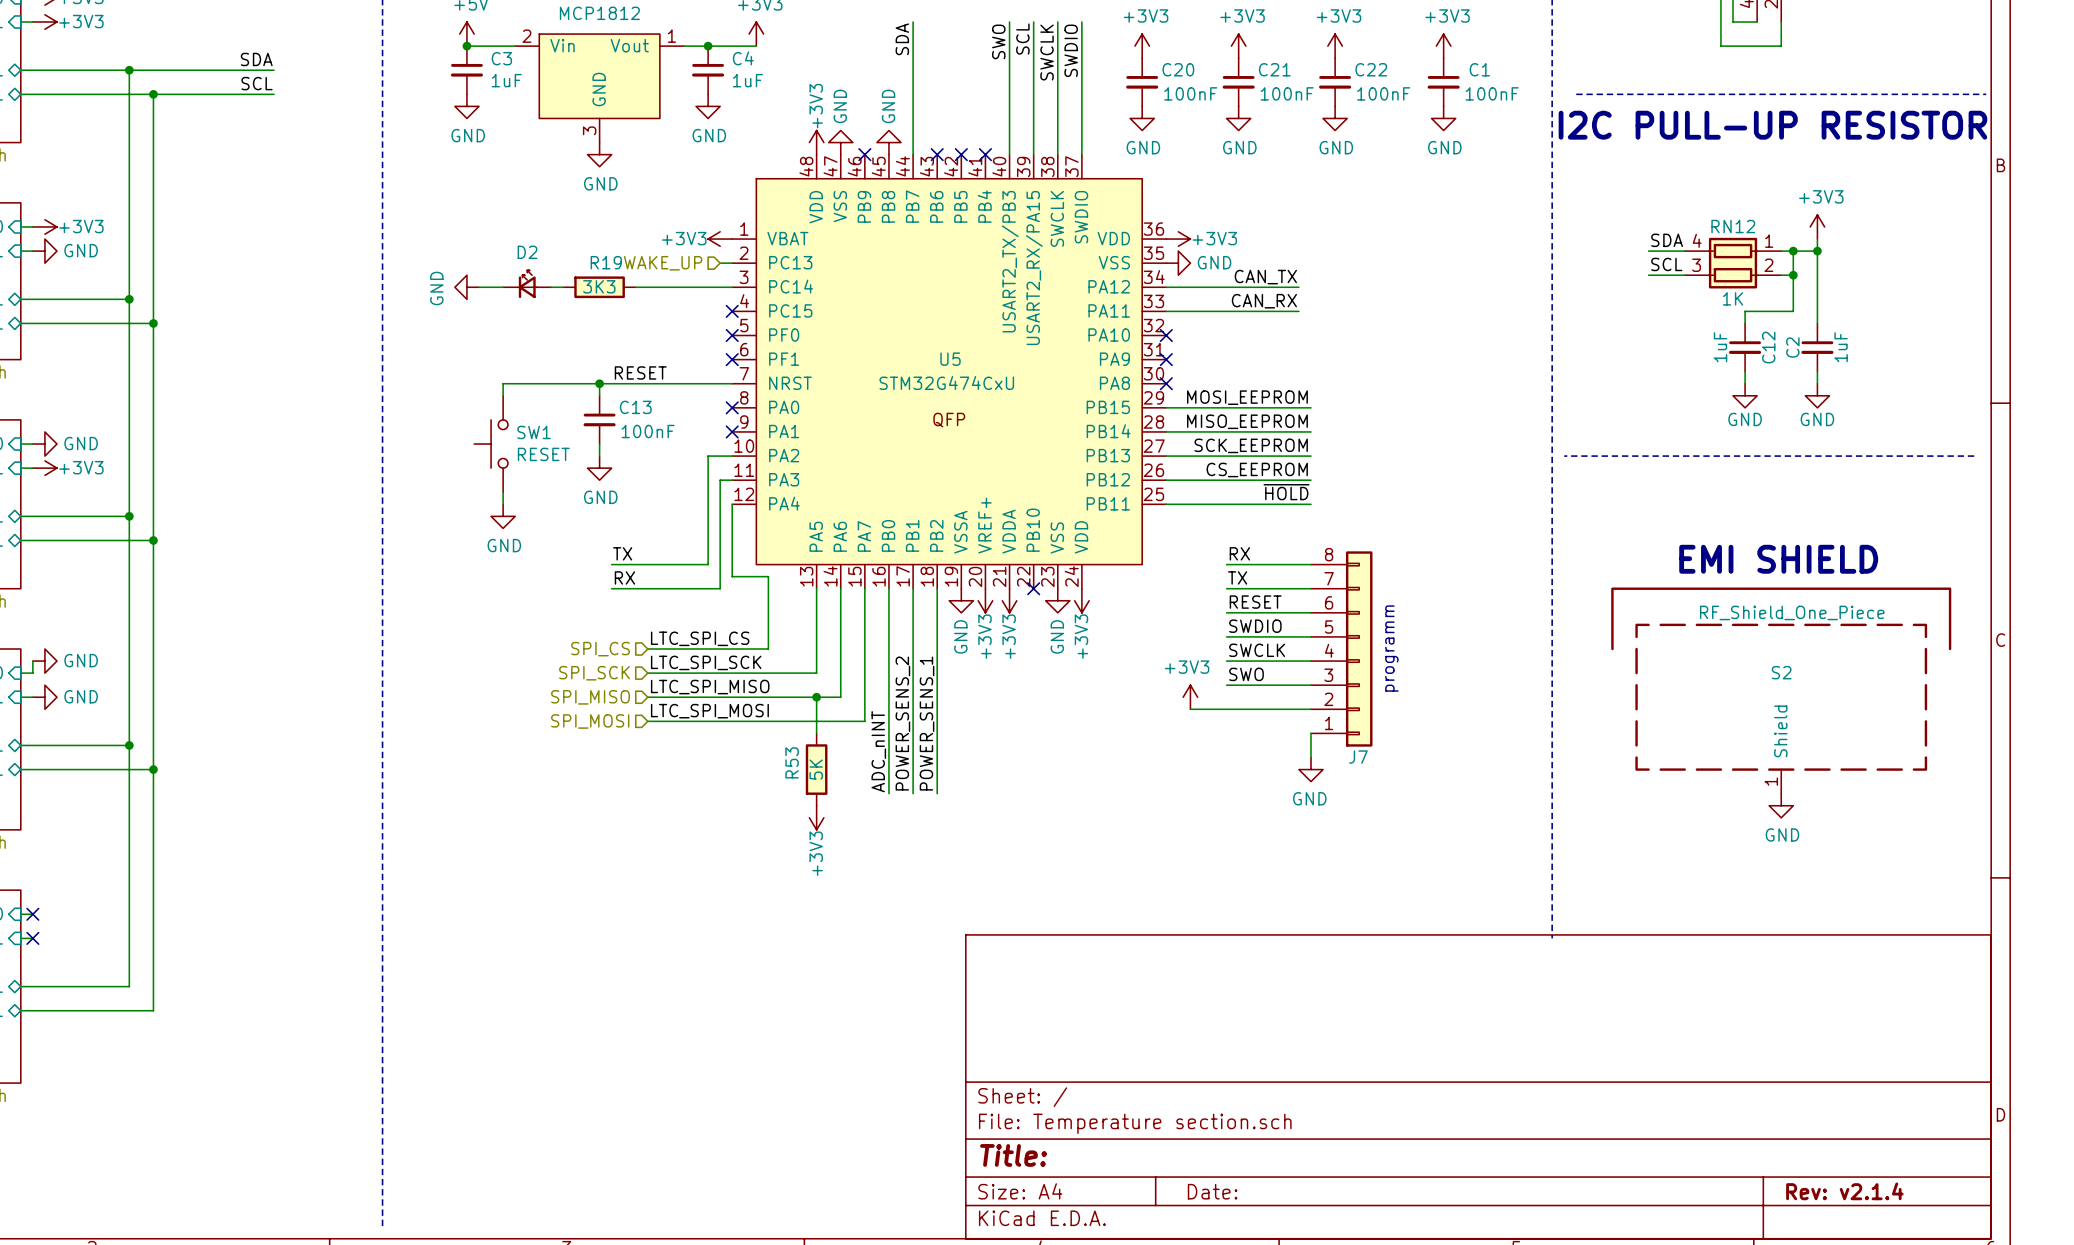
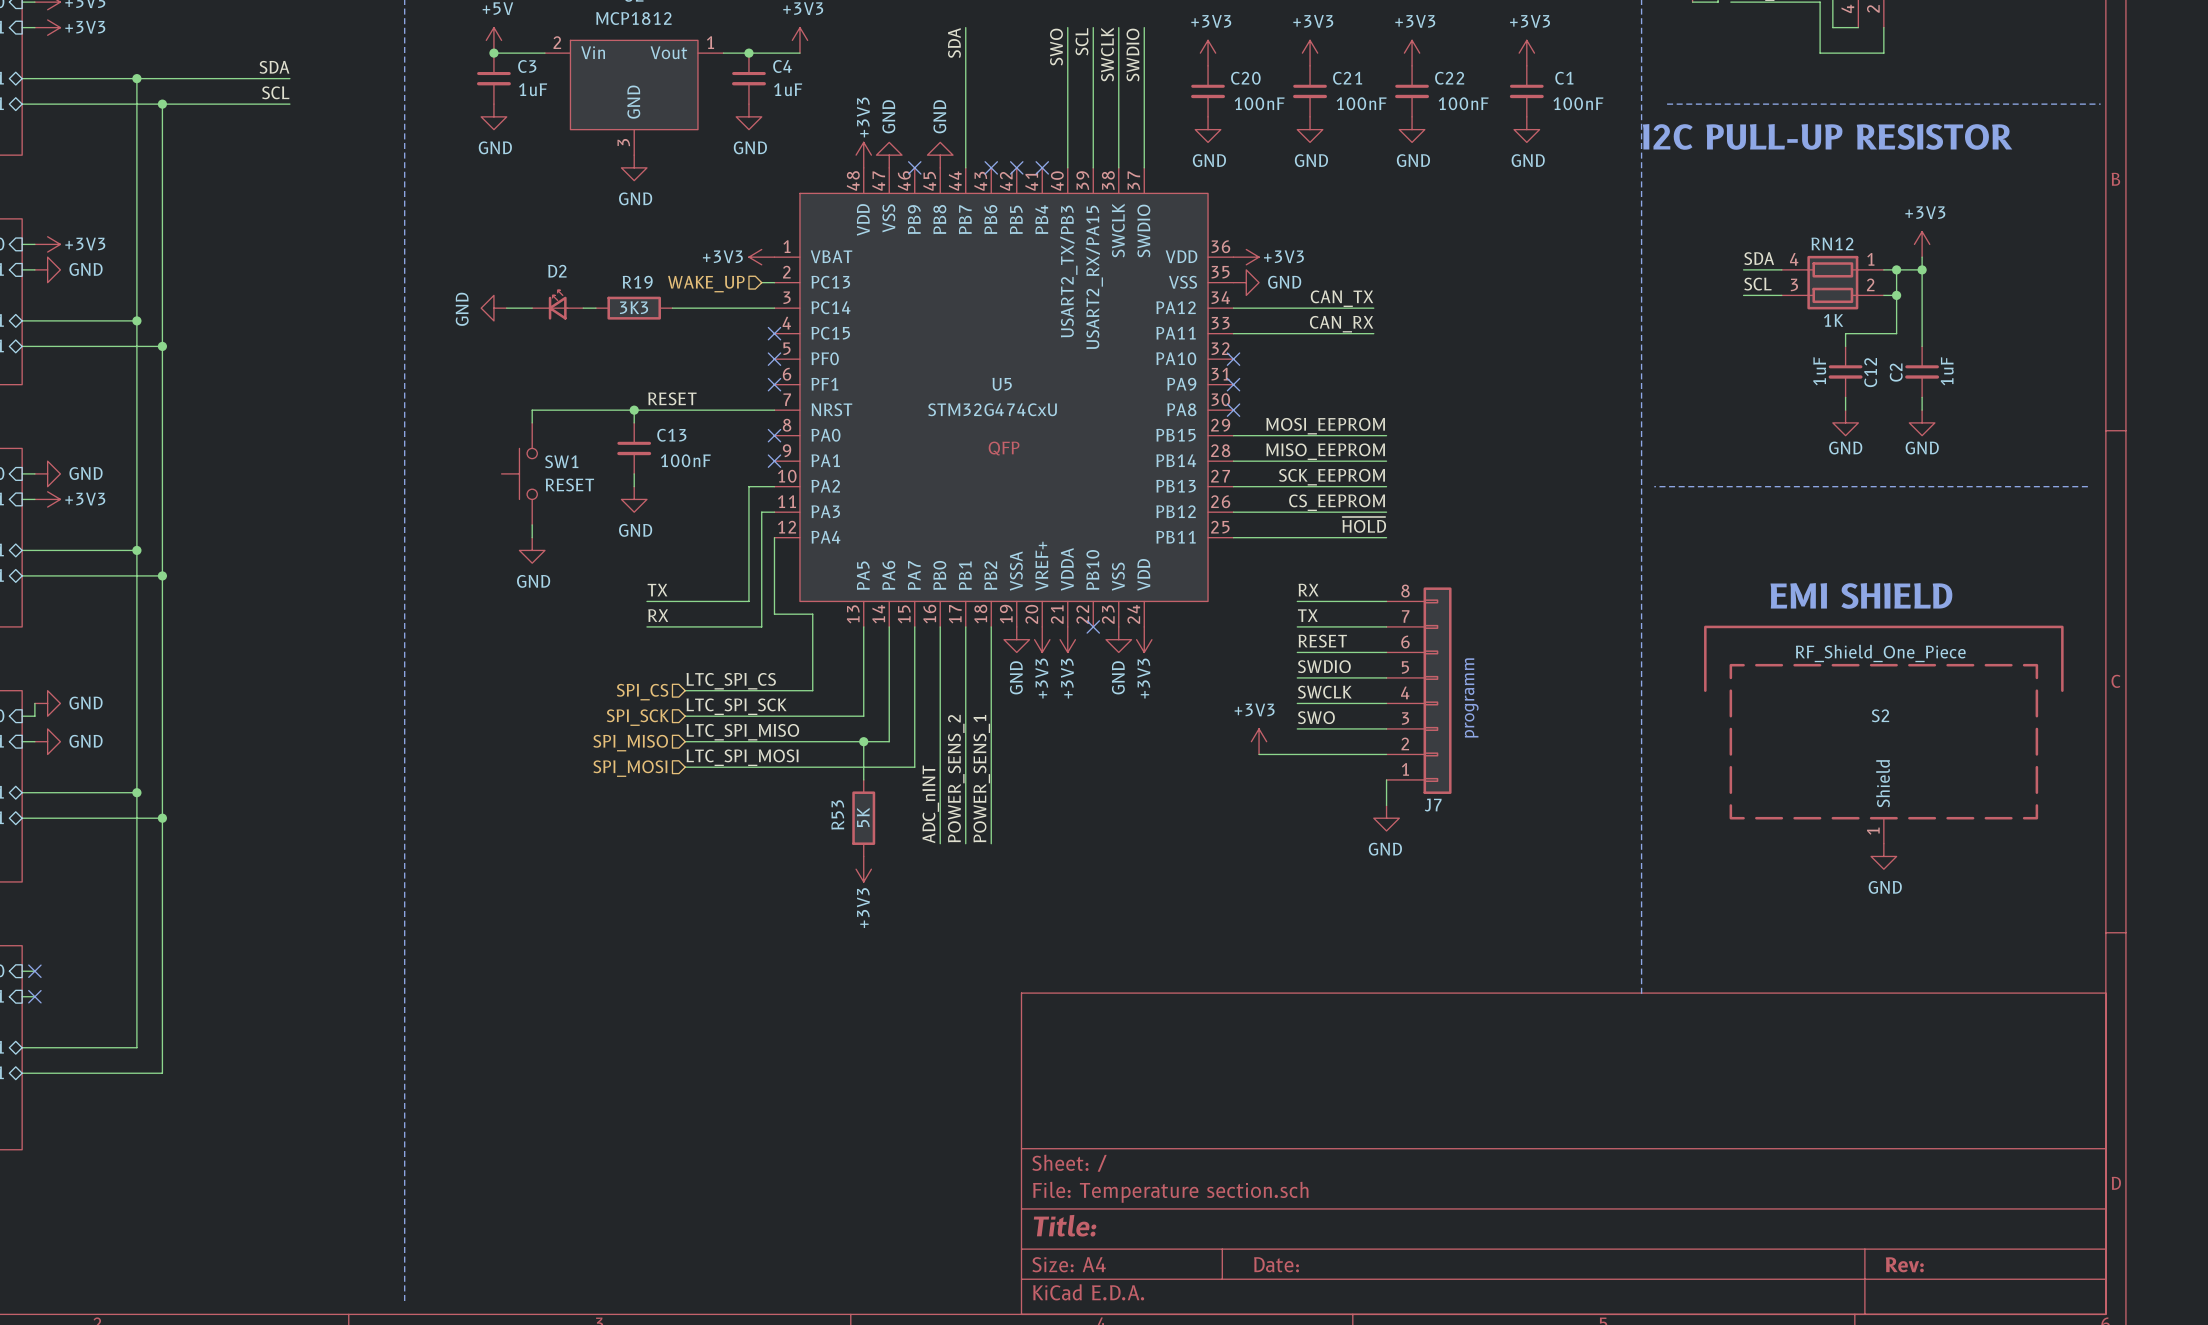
title block: Rev: v2.1.4 (1844, 1191) -> Rev: (1904, 1264)

